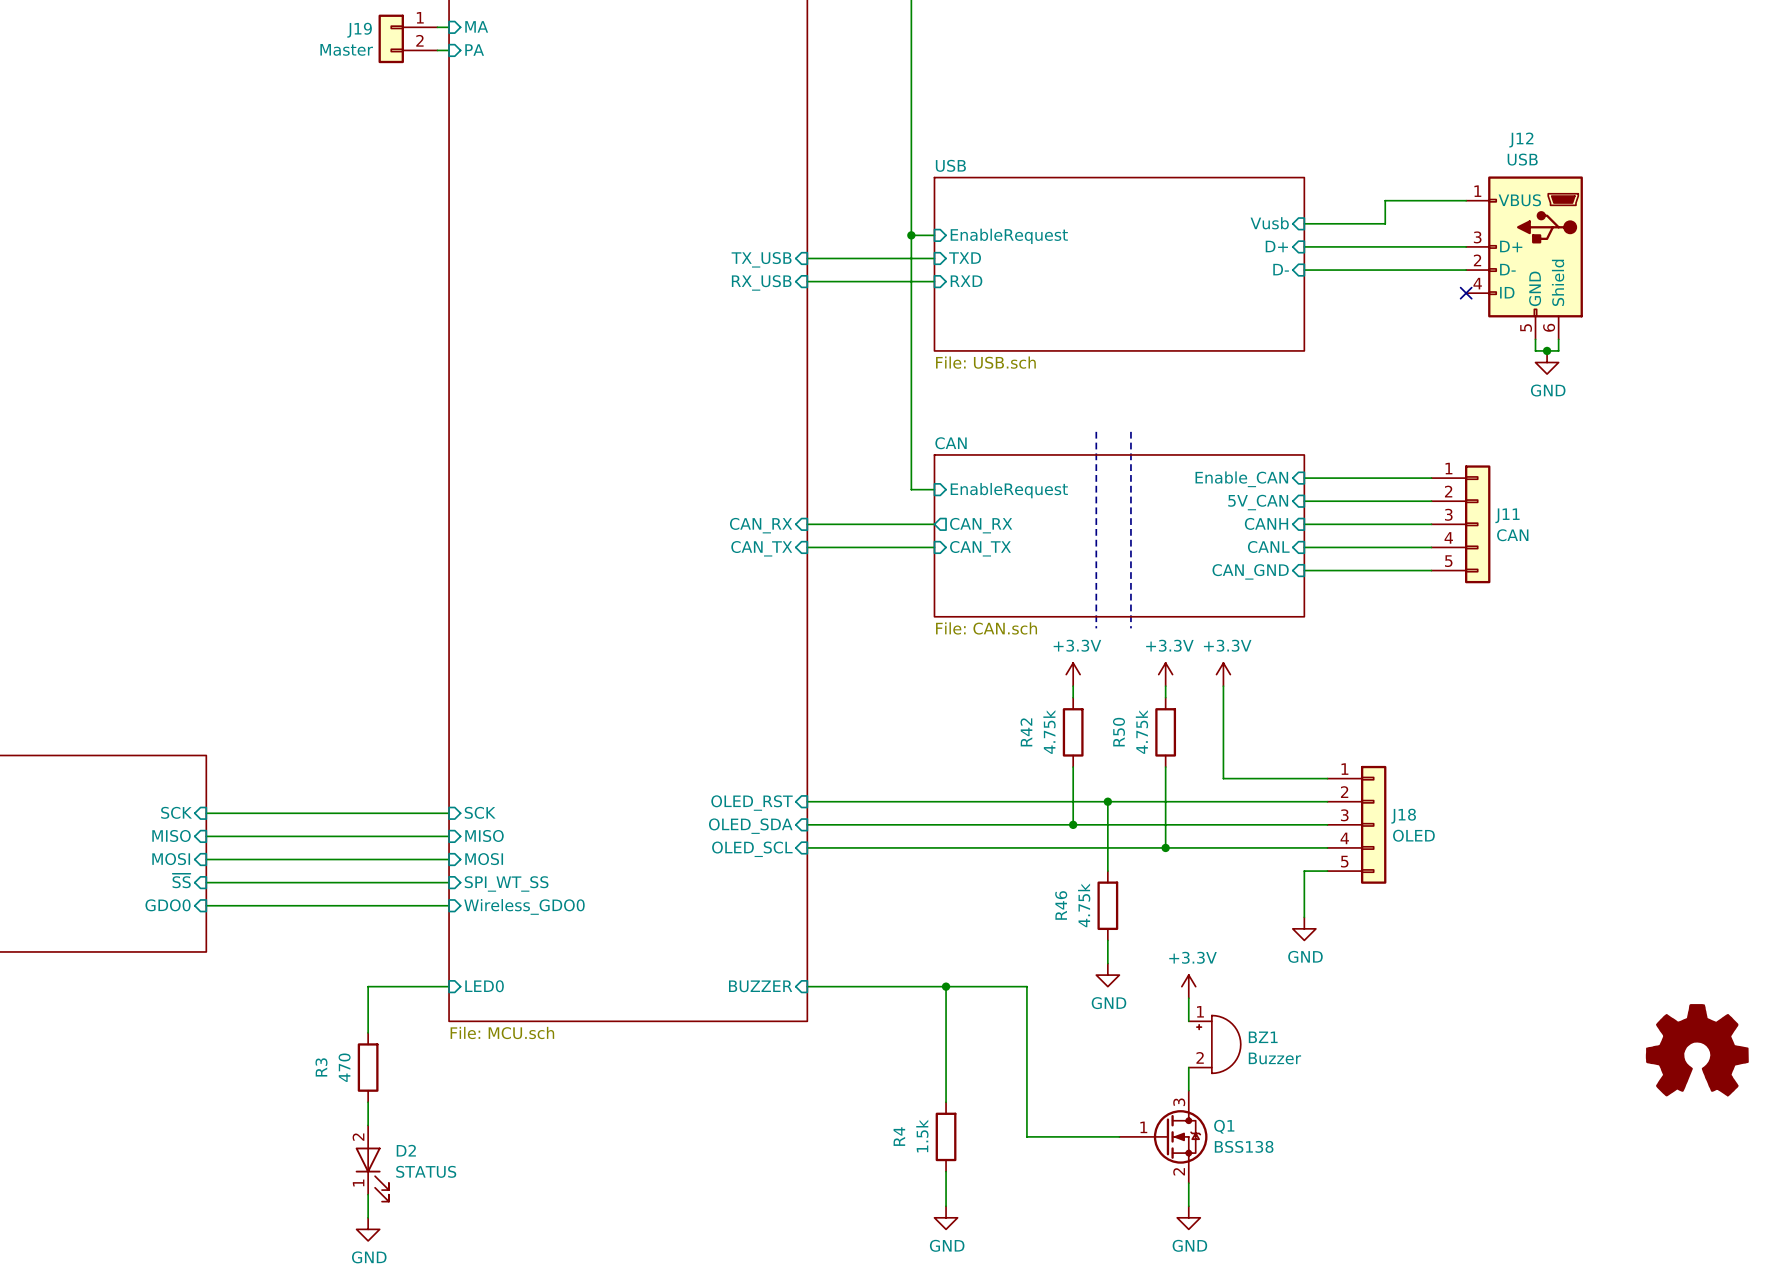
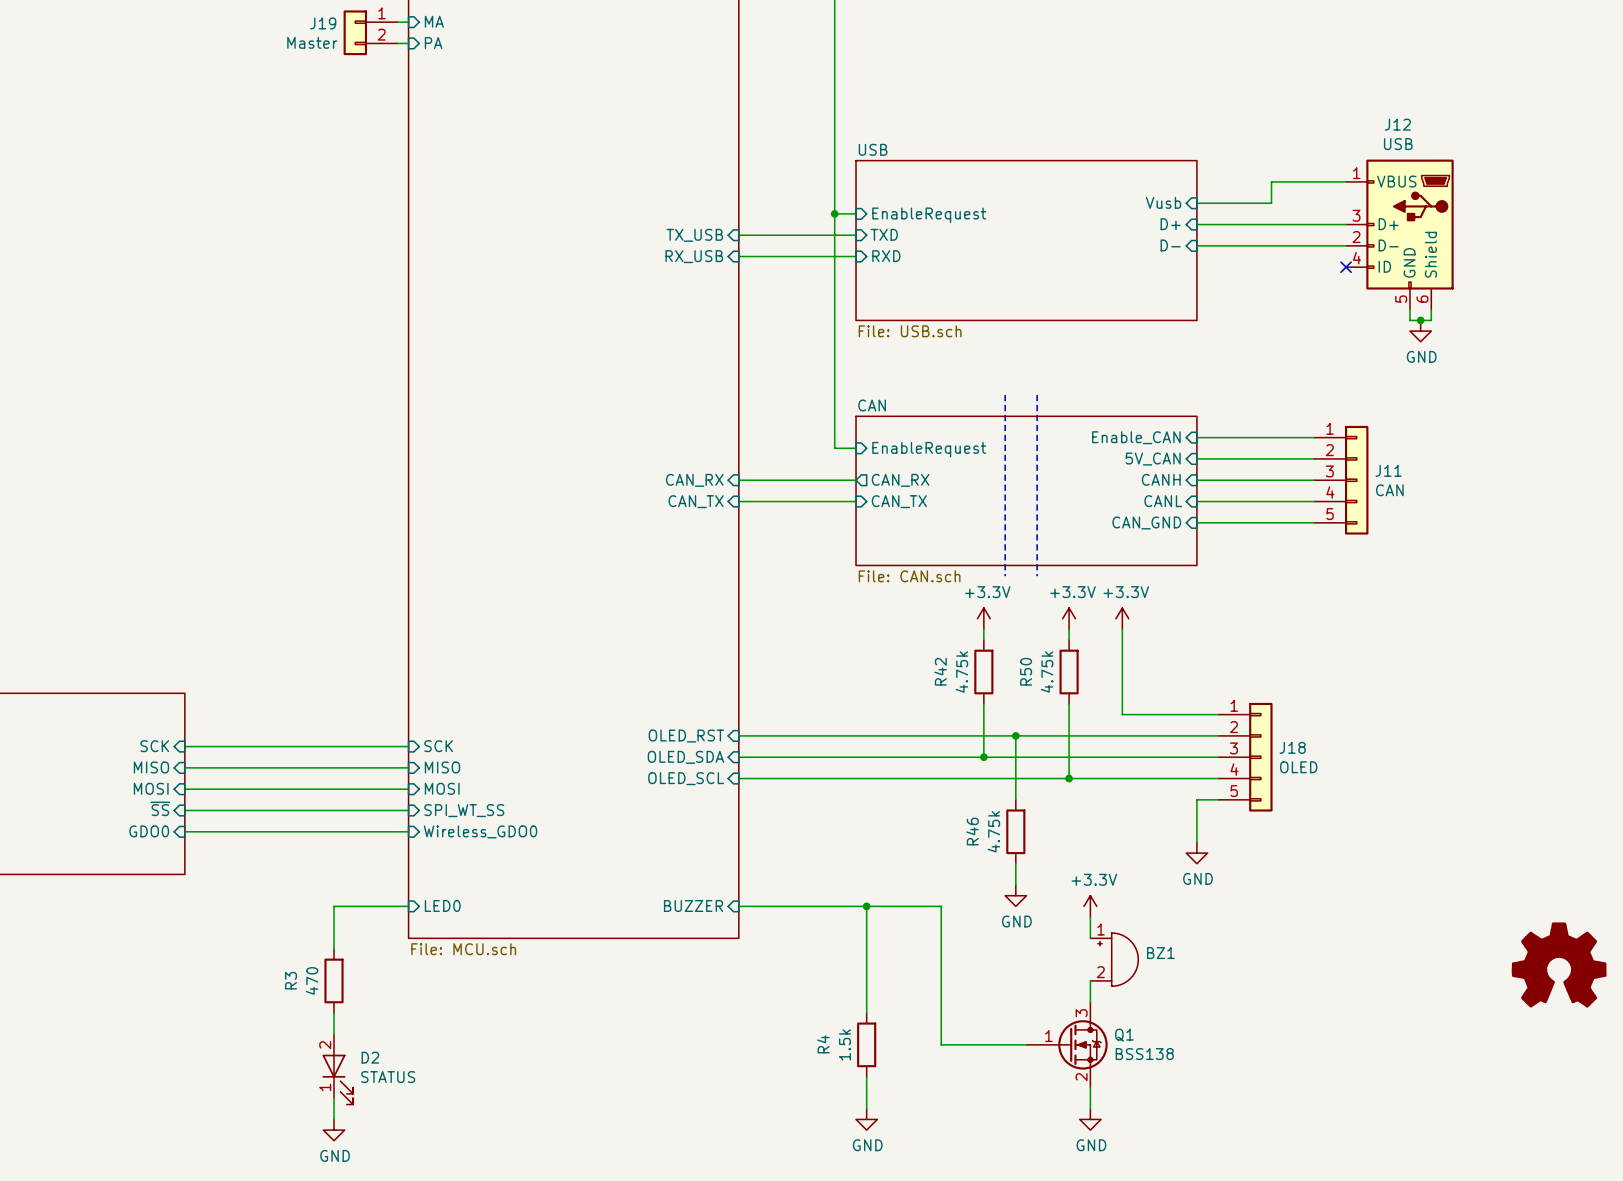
BZ1 value: Buzzer (1274, 1058) -> none

